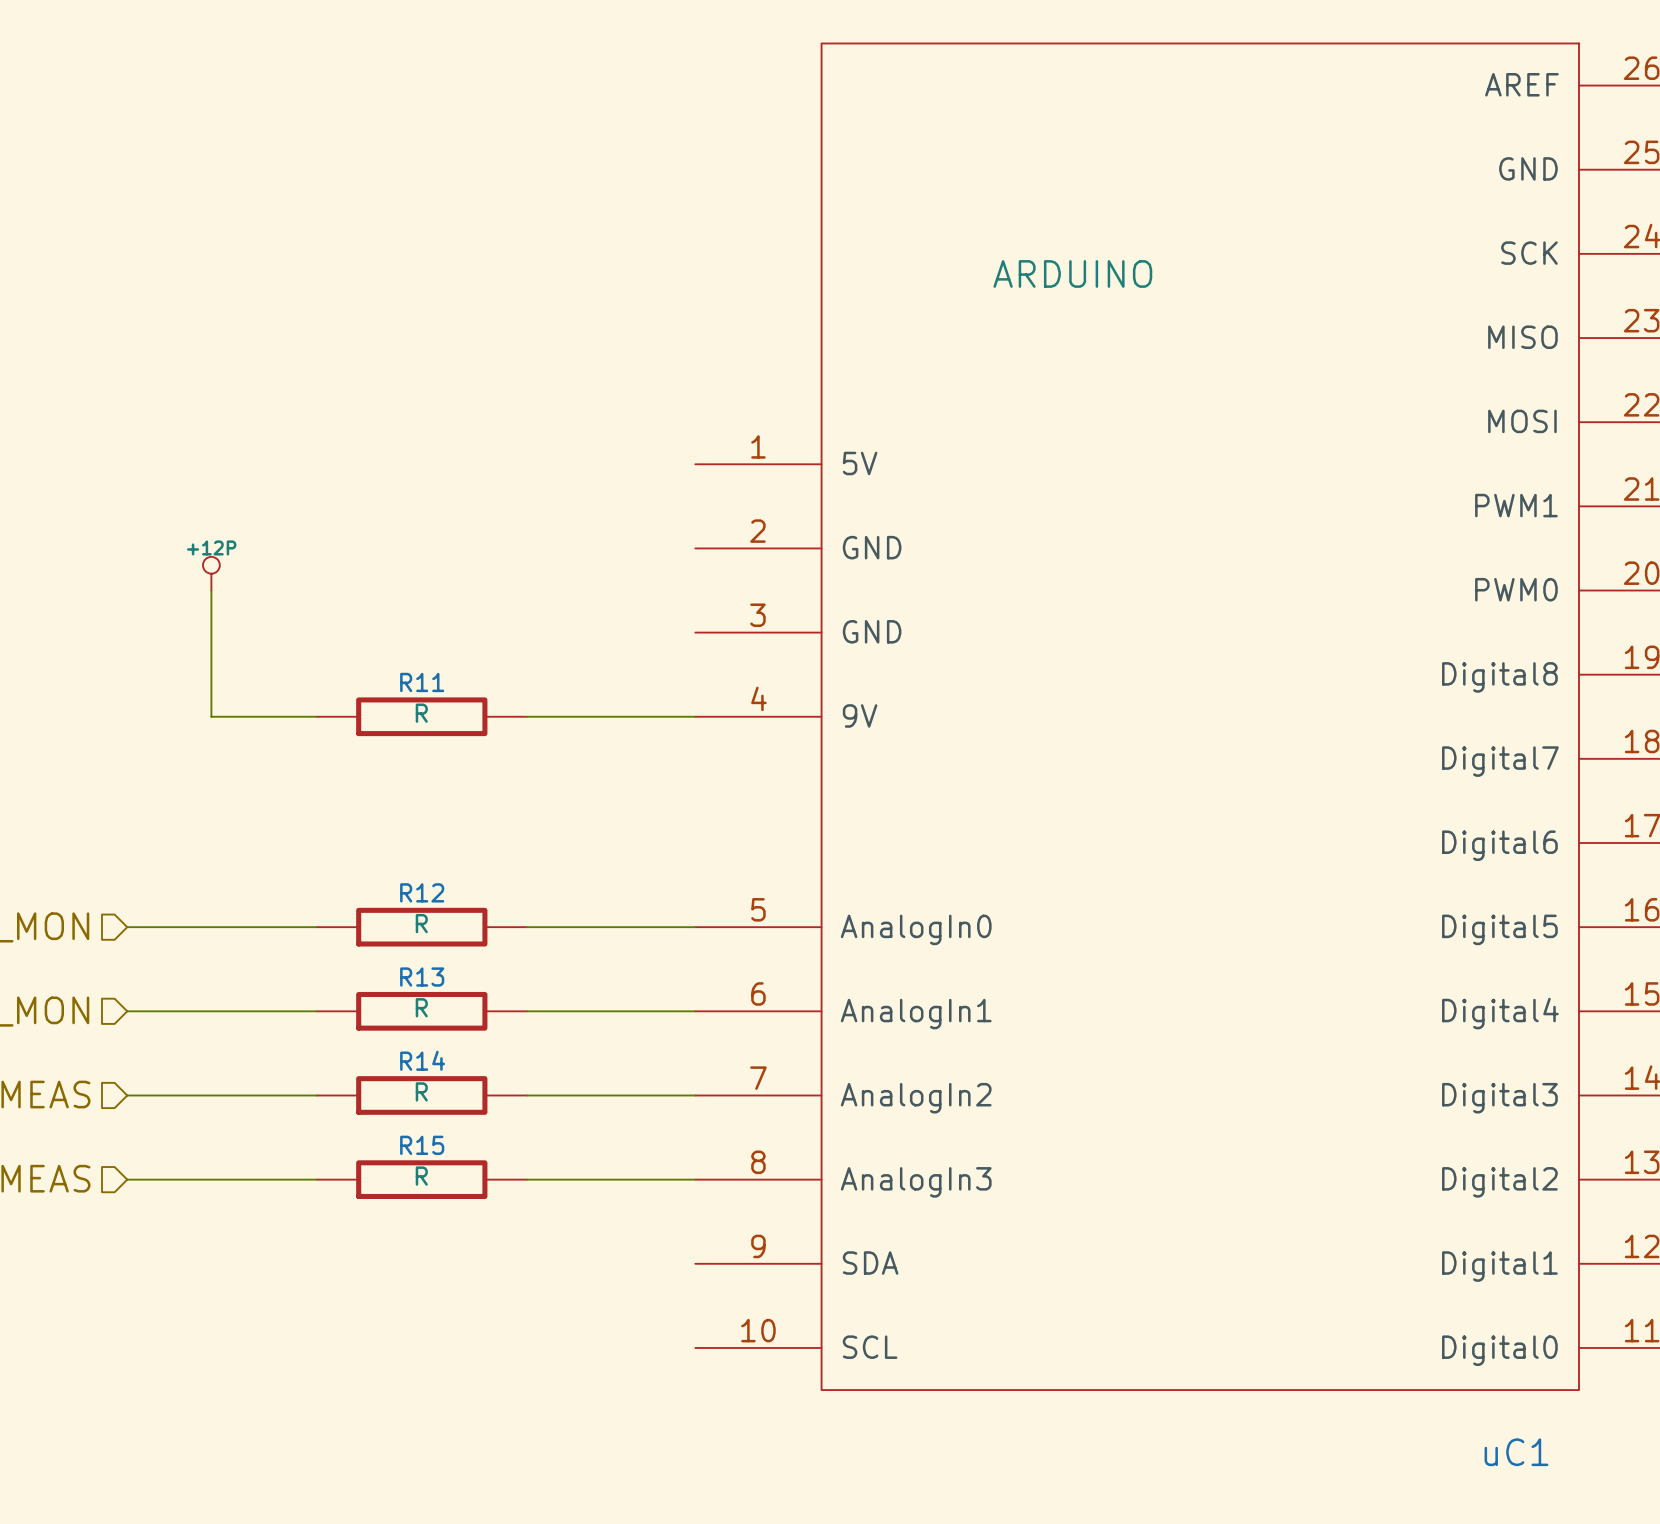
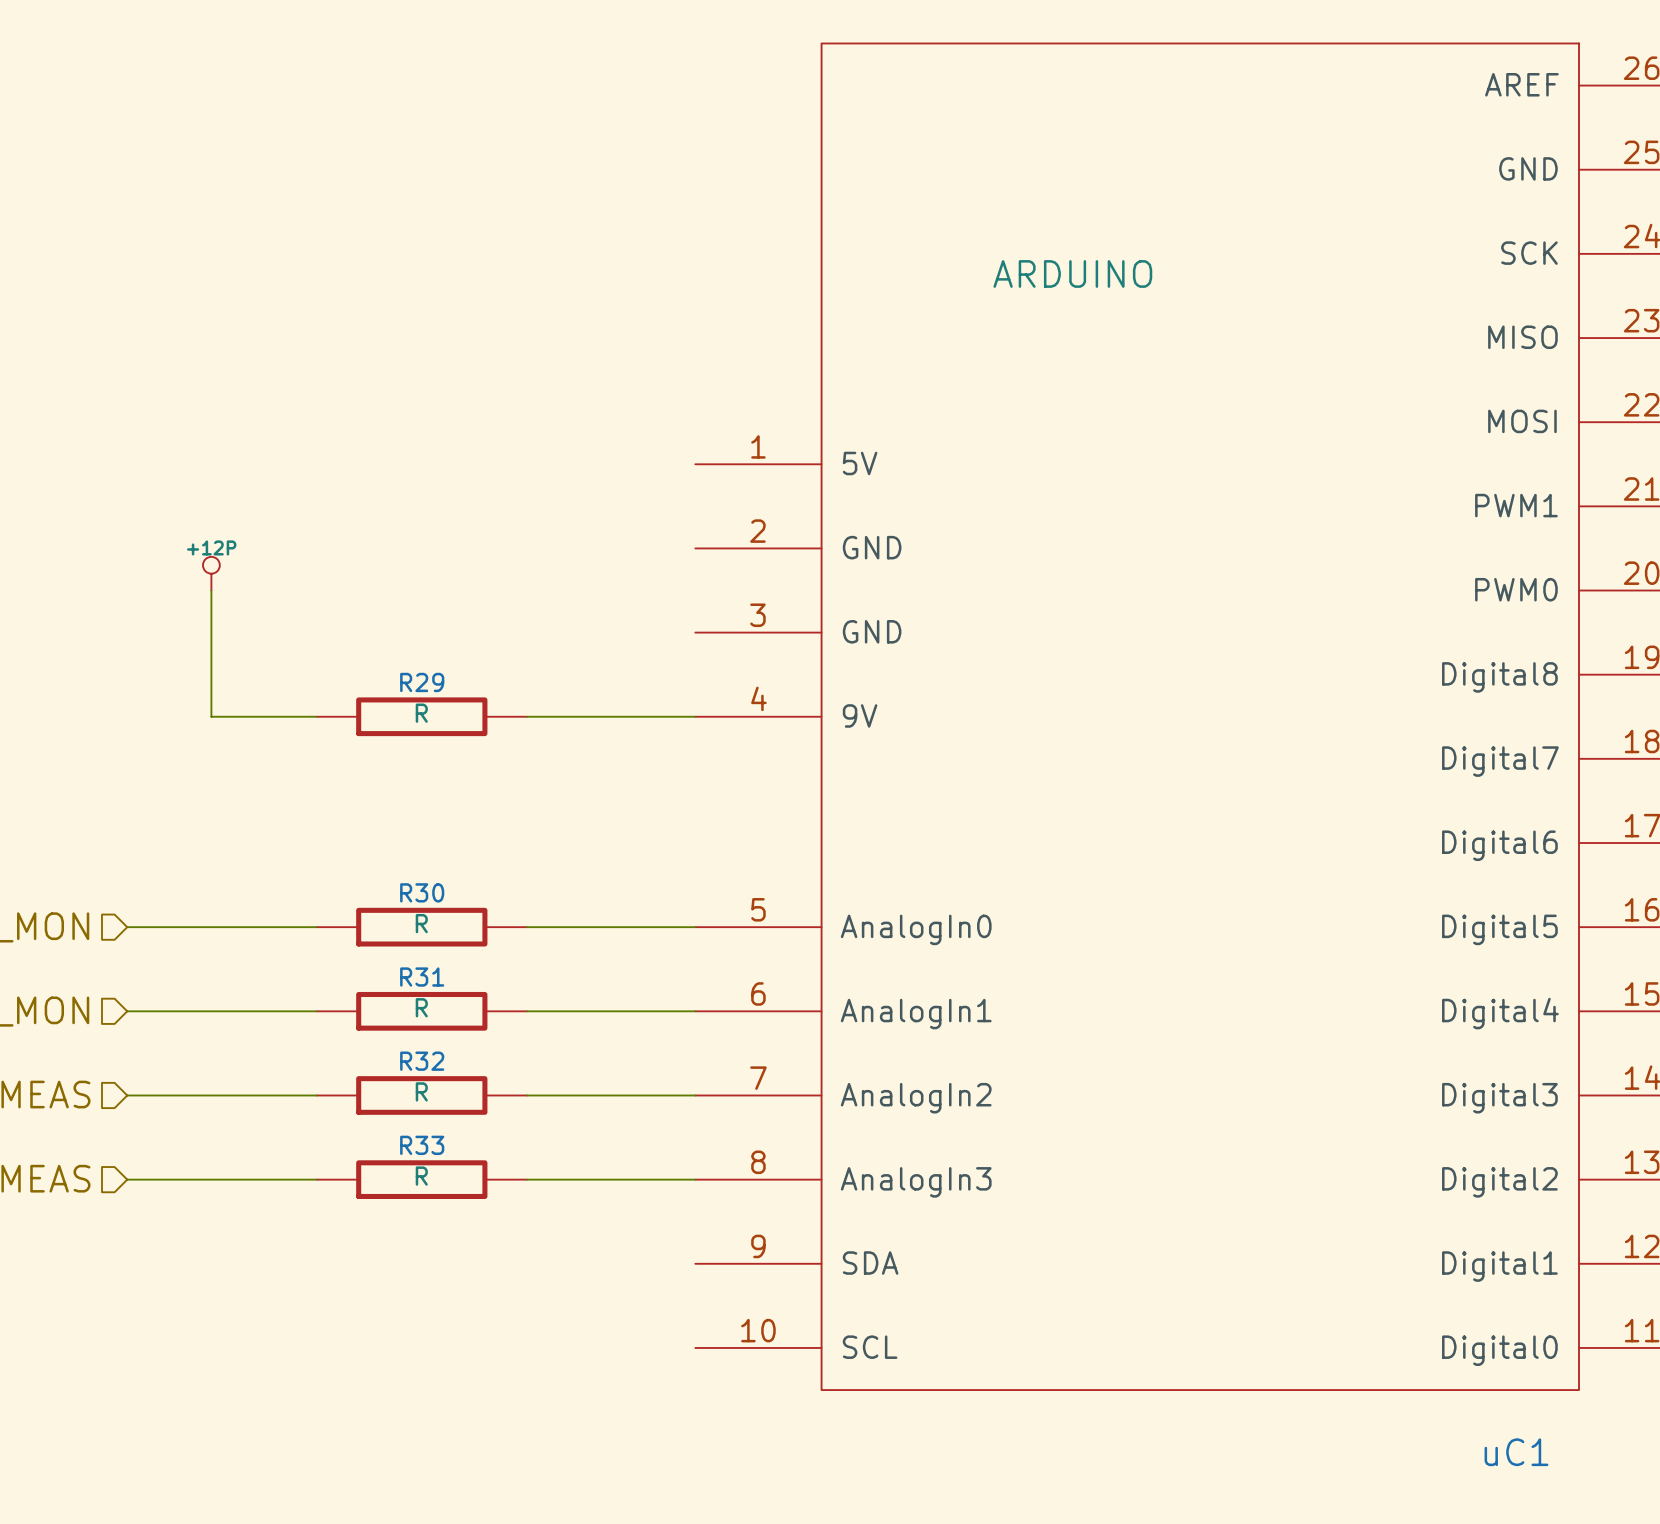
R11 name: R11 (422, 682) -> R29 (422, 682)
R12 name: R12 (422, 892) -> R30 (422, 892)
R13 name: R13 (422, 977) -> R31 (422, 977)
R14 name: R14 (422, 1060) -> R32 (422, 1061)
R15 name: R15 (422, 1145) -> R33 (422, 1145)

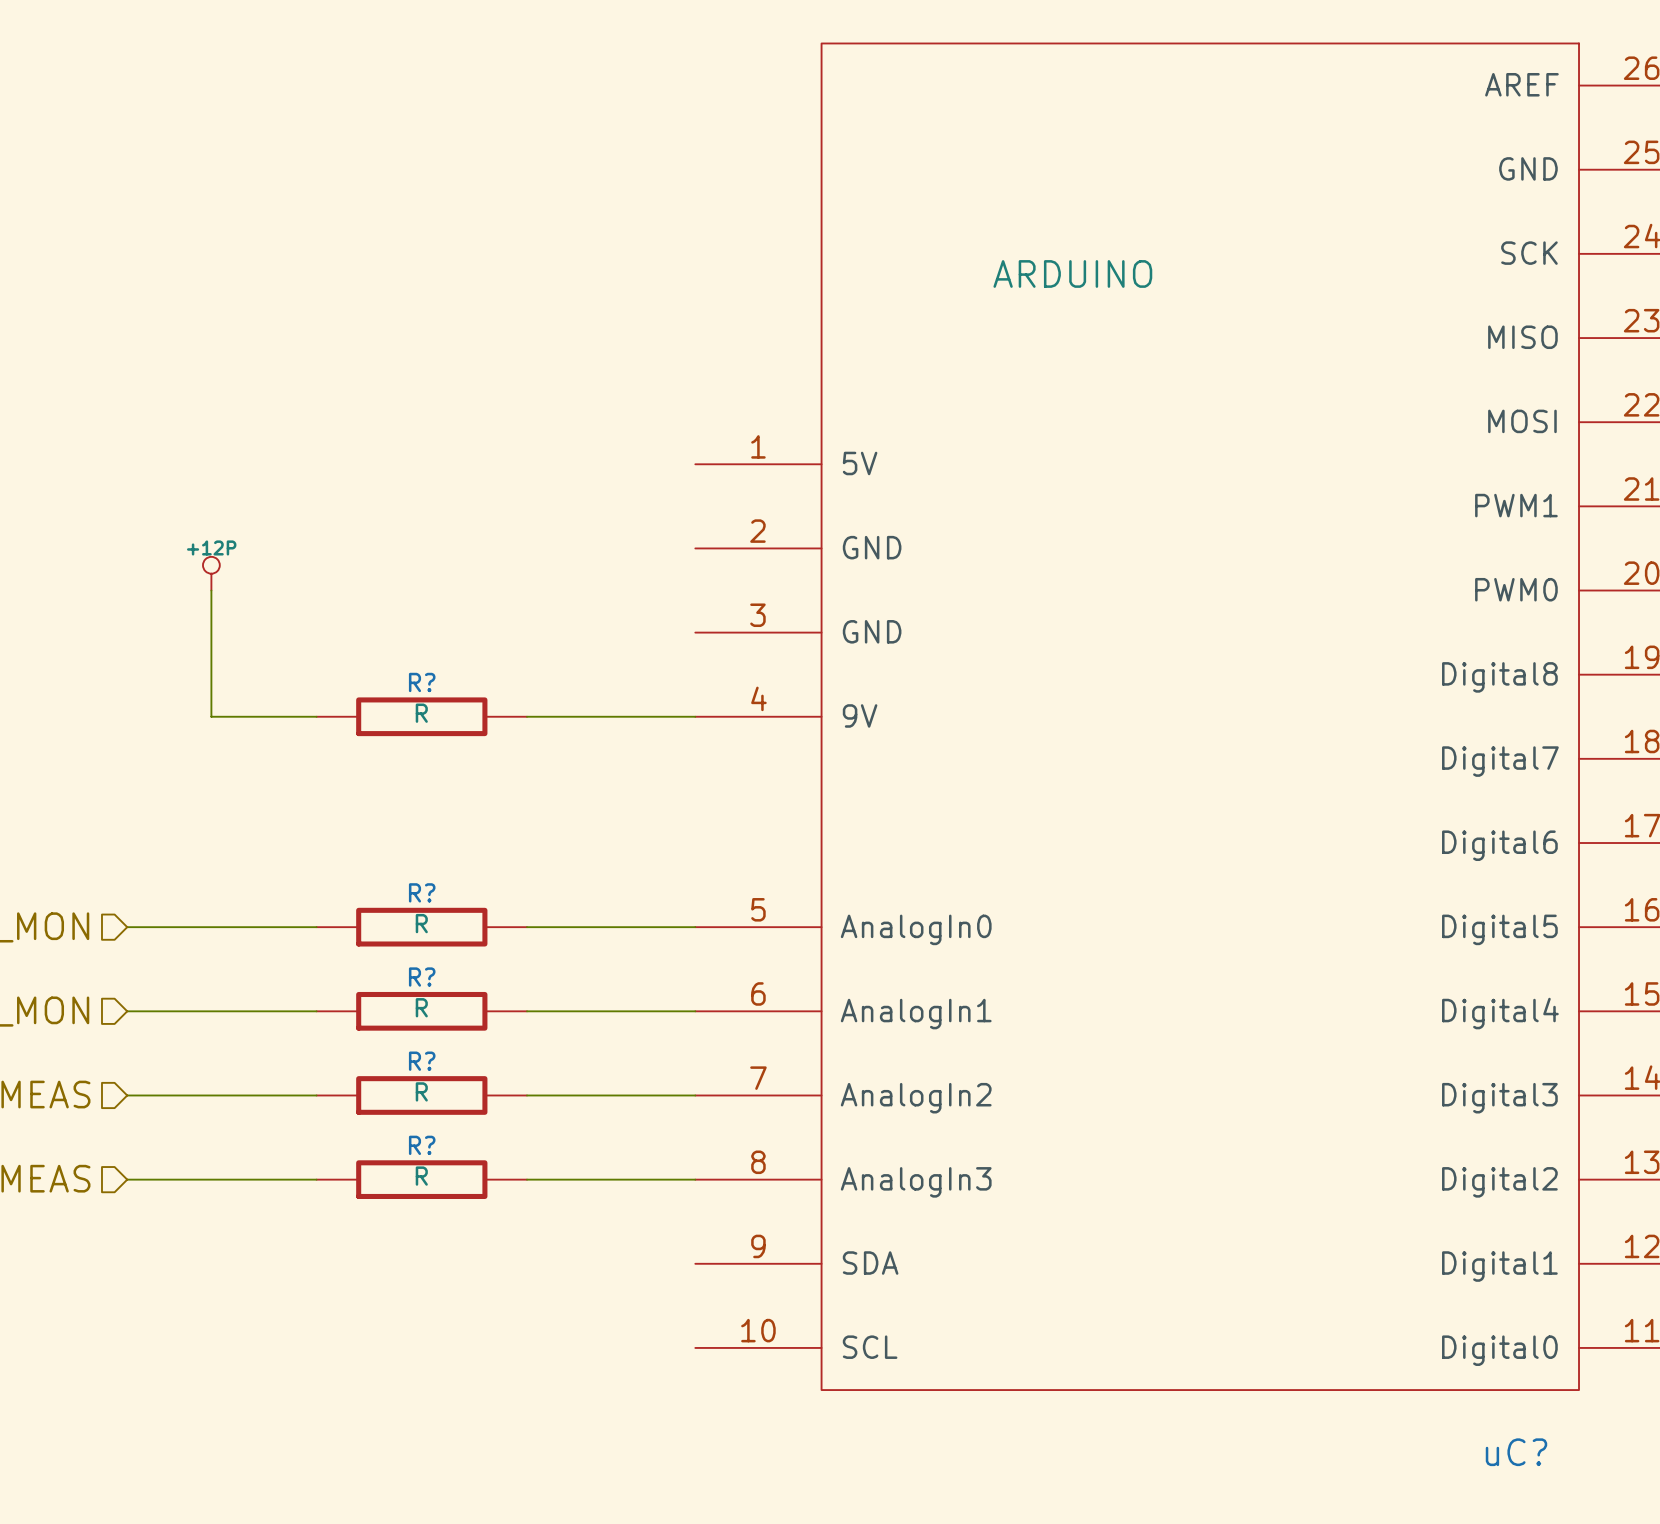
R29 name: R29 (422, 682) -> R? (422, 682)
R30 name: R30 (422, 892) -> R? (422, 892)
R31 name: R31 (422, 977) -> R? (422, 977)
R32 name: R32 (422, 1061) -> R? (422, 1061)
R33 name: R33 (422, 1145) -> R? (422, 1145)
uC1 name: uC1 (1516, 1452) -> uC? (1516, 1452)

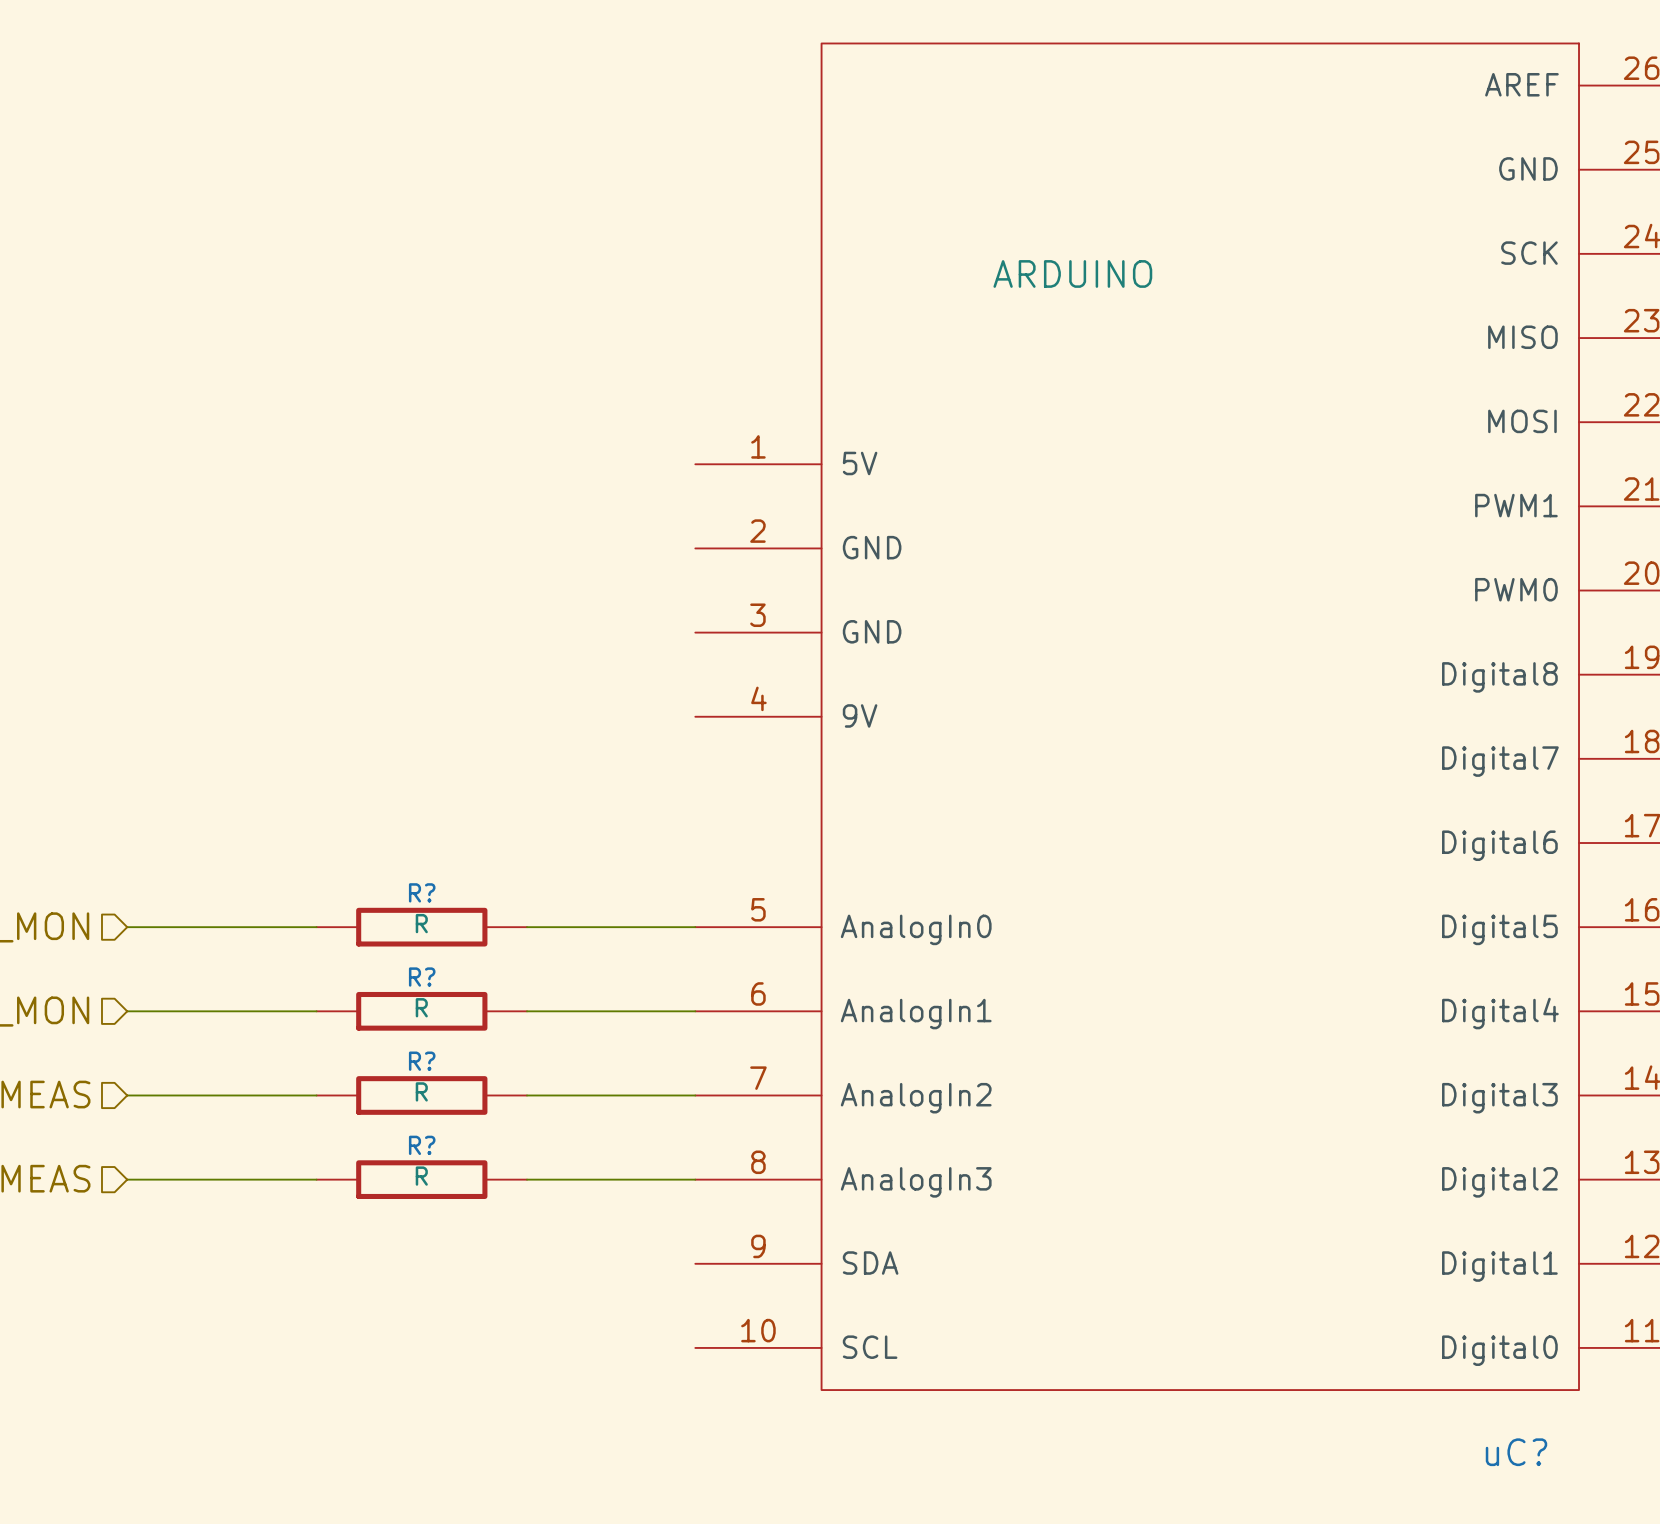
power symbol: +12P (211, 573) -> none
wire: (211, 590) (211, 716) (316, 716) -> none
R?: R (421, 716) -> none
wire: (527, 716) (695, 716) -> none

